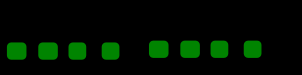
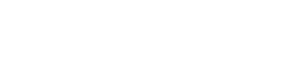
part: (174, 49) -> none
part: (236, 49) -> none
part: (32, 51) -> none
part: (93, 51) -> none

